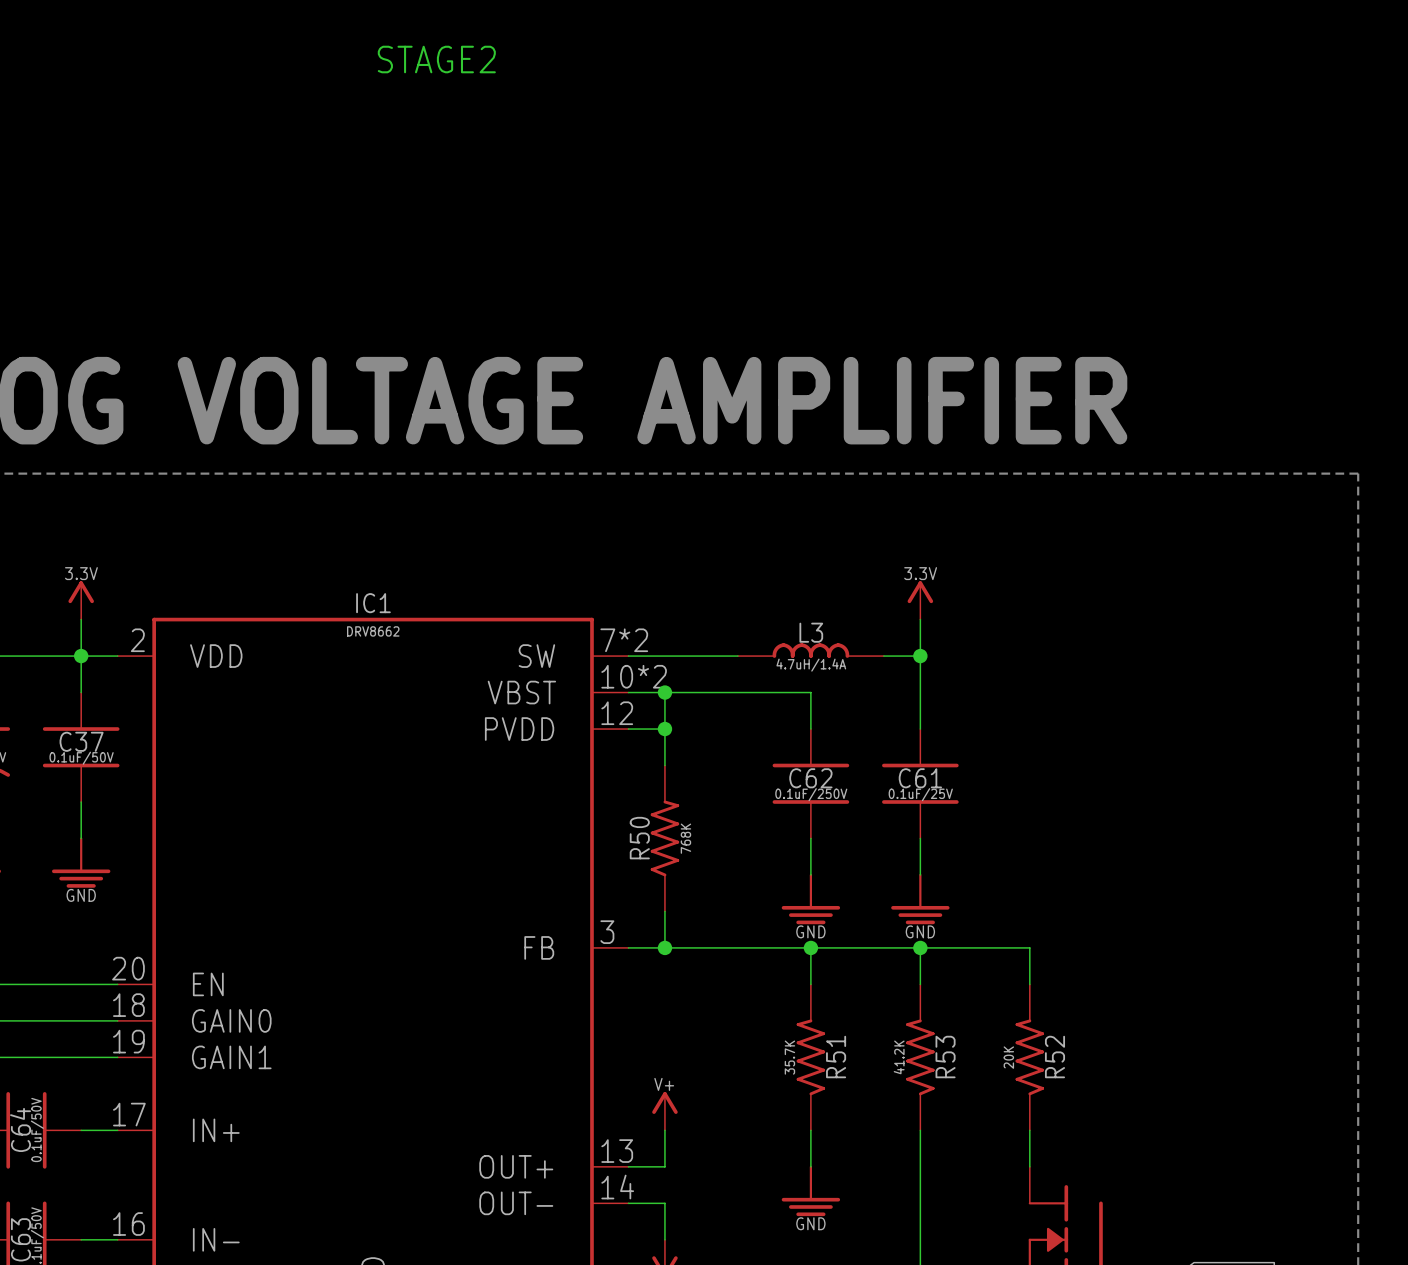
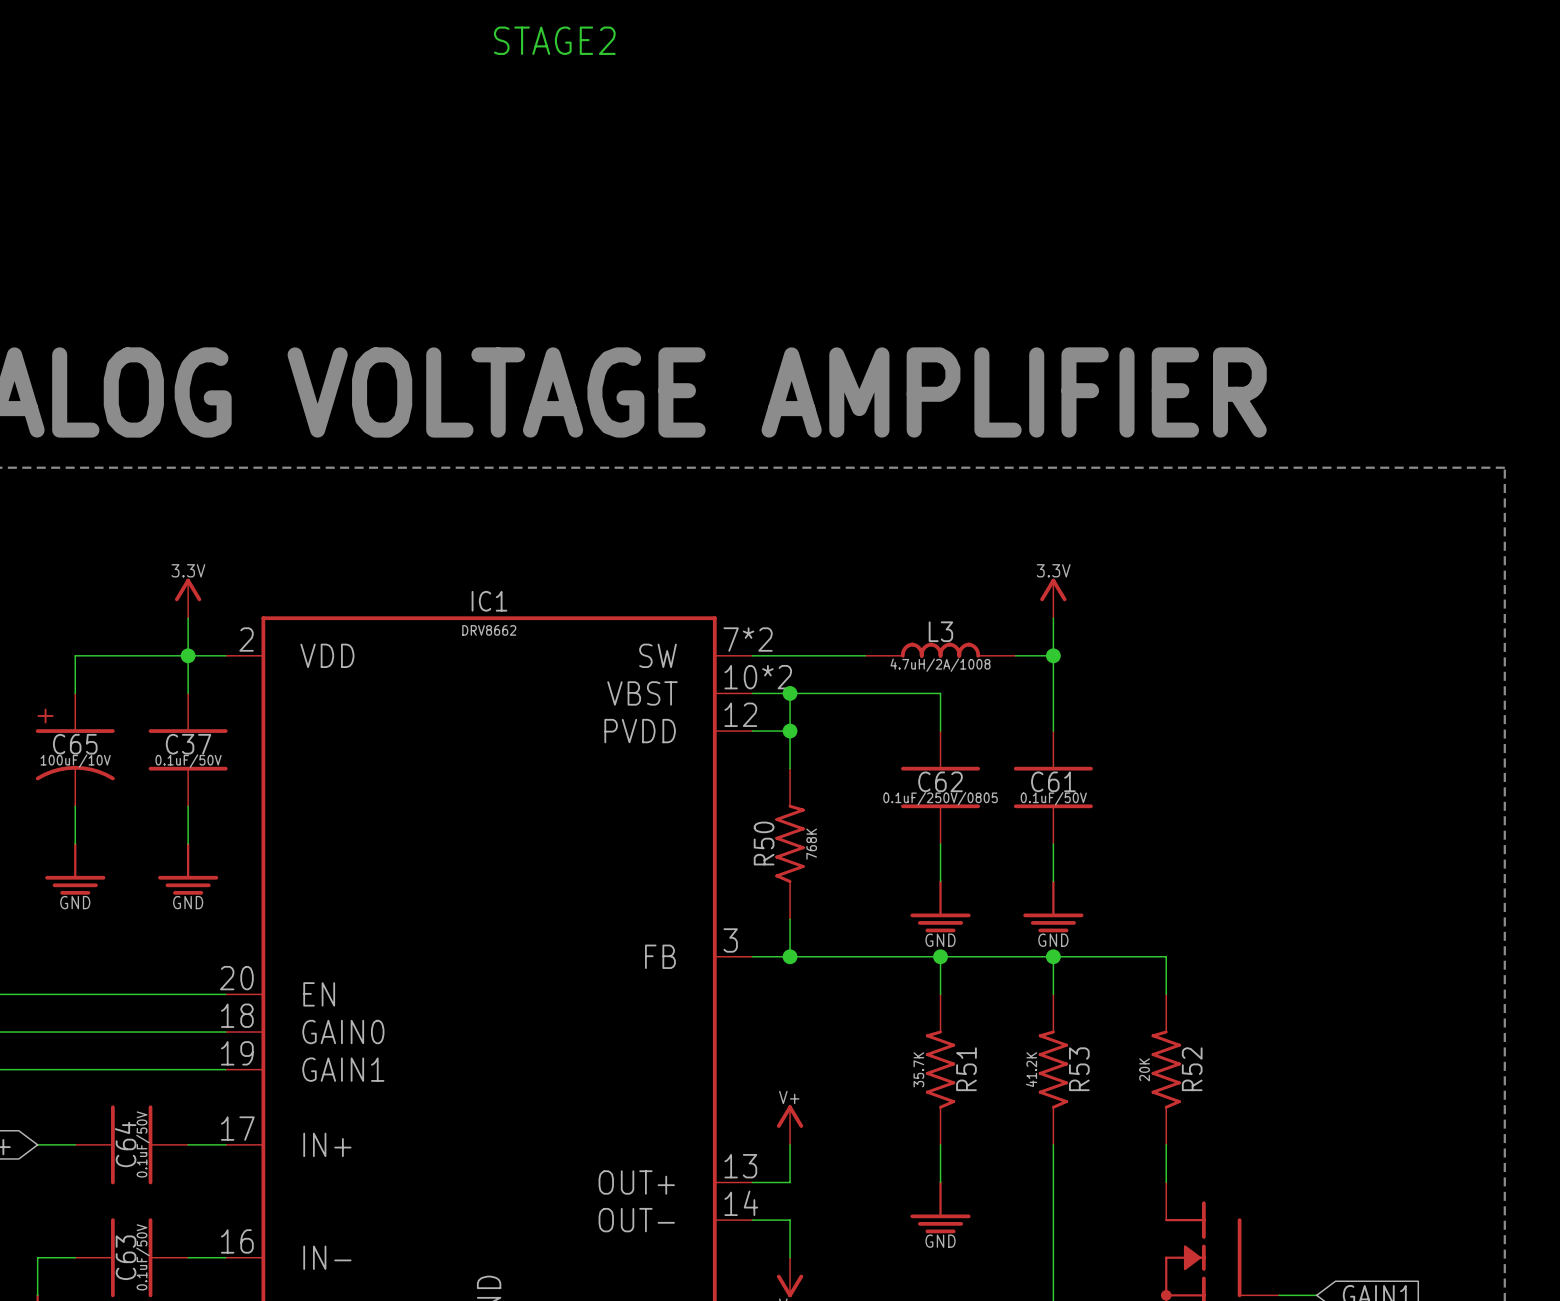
L3 value: 4.7uH/1.4A (811, 665) -> 4.7uH/2A/1008 (940, 665)
C62 value: 0.1uF/250V (811, 794) -> 0.1uF/250V/0805 (940, 798)
C61 value: 0.1uF/25V (920, 794) -> 0.1uF/50V (1053, 798)

